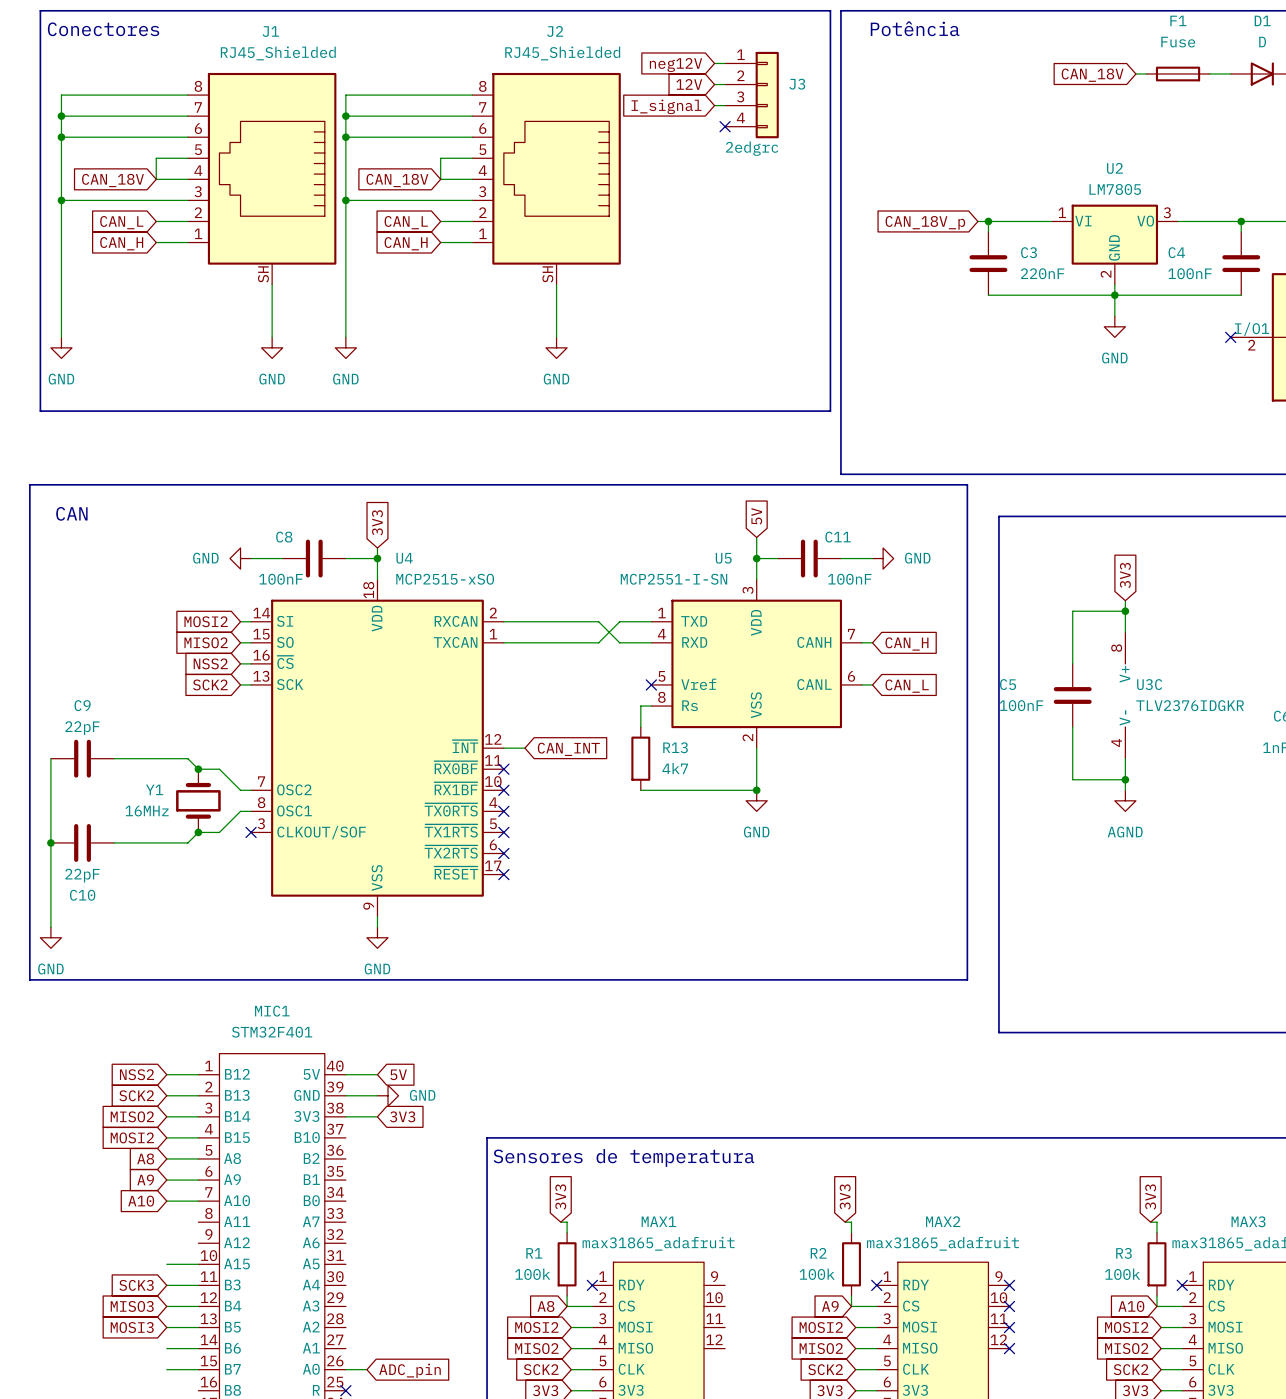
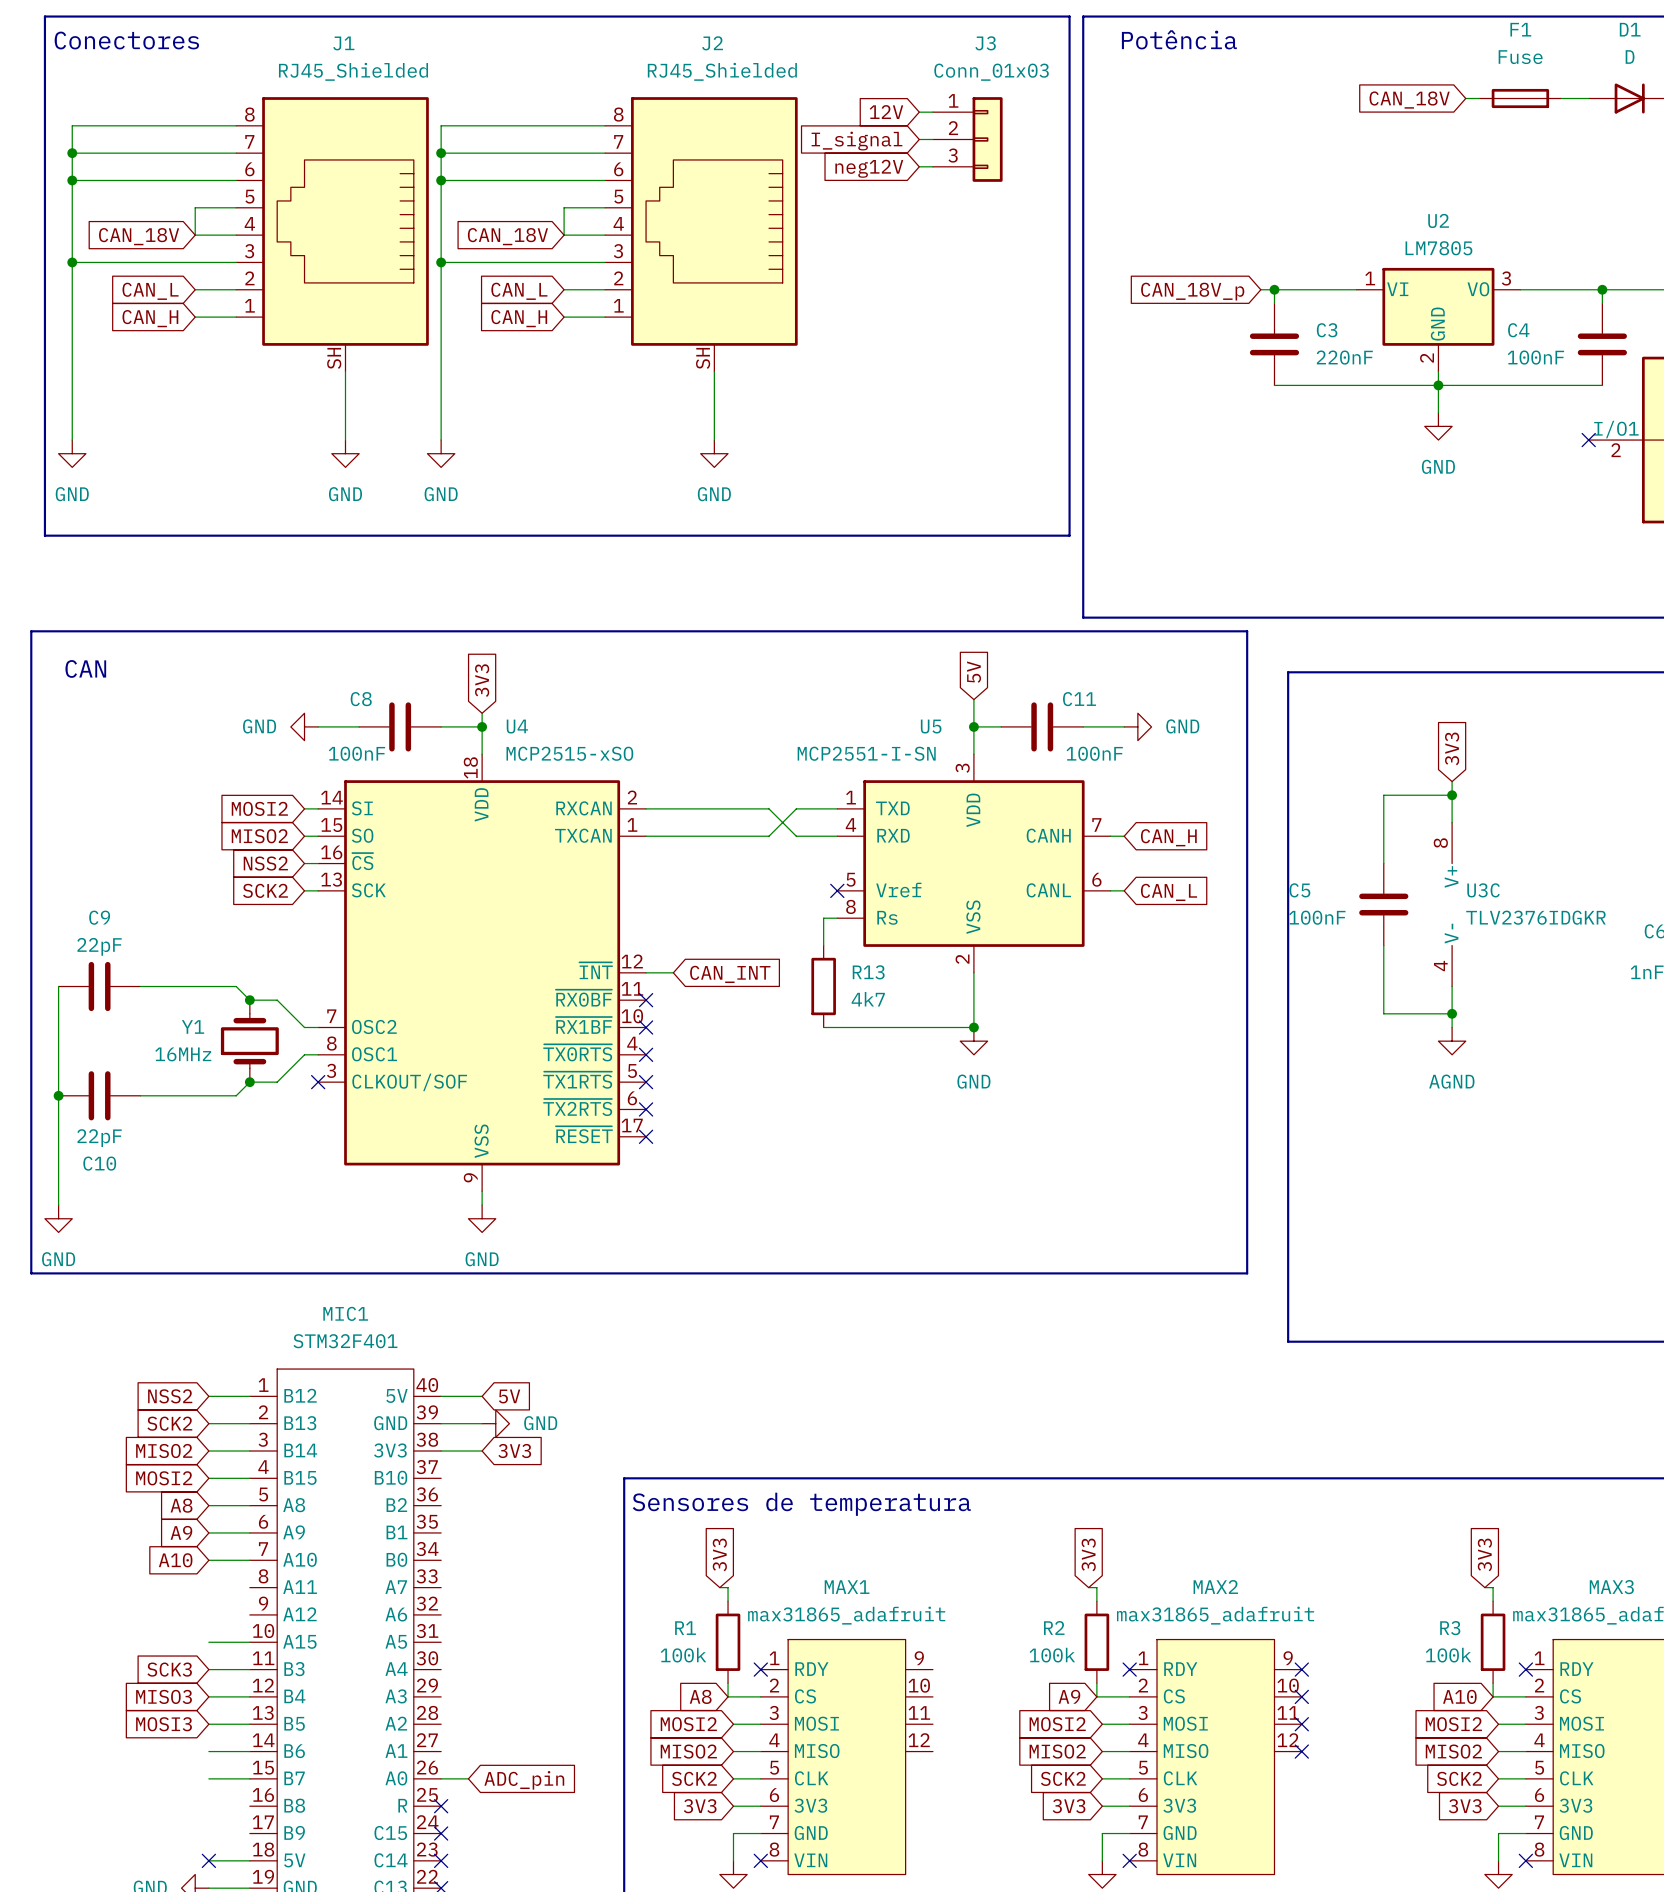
J3 symbol: [725, 51, 779, 139] -> [932, 97, 1003, 182]
wire: (714, 63) (725, 63) -> (919, 166) (932, 166)
global label position: neg12V (676, 64) -> neg12V (869, 168)
J3 name position: J3 (797, 84) -> J3 (985, 43)
no-connect mark: (725, 126) -> none
J3 value: 2edgrc (752, 148) -> Conn_01x03 (991, 72)

